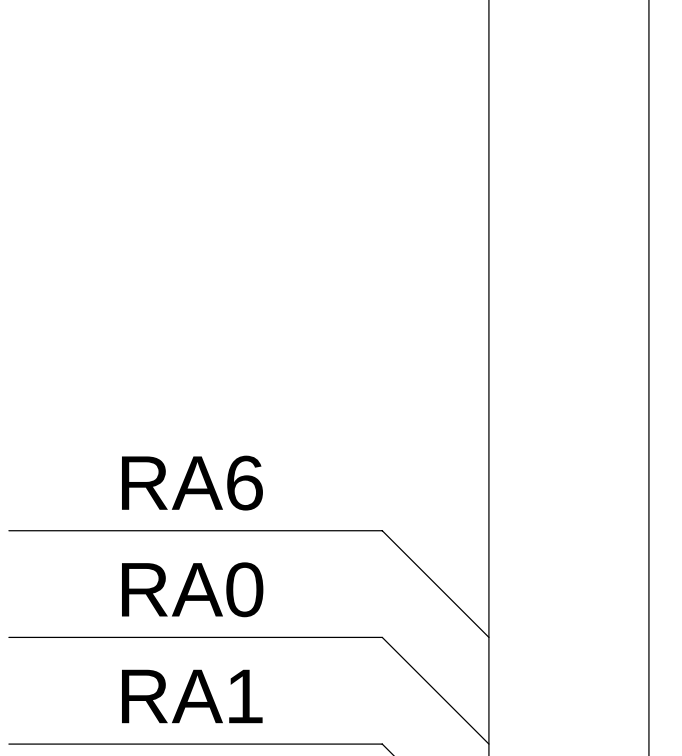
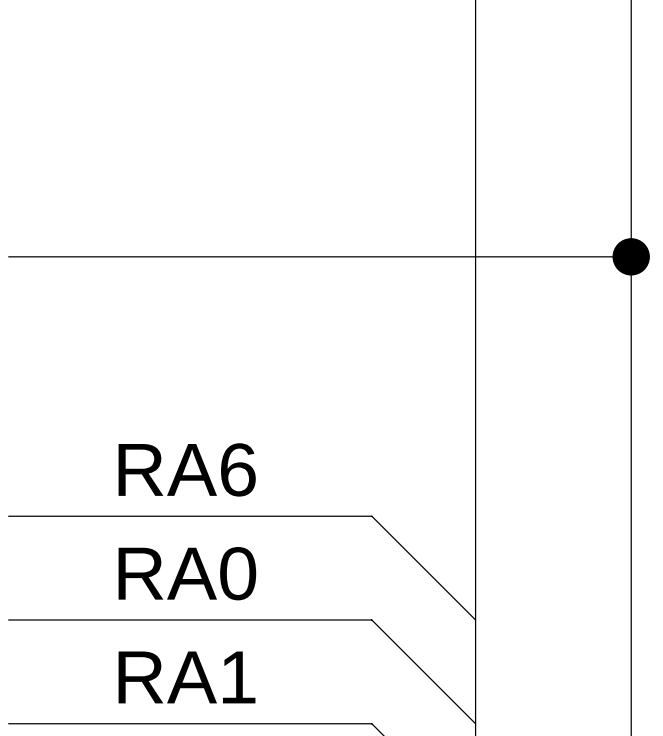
wire: none -> (8, 256) (631, 256)
junction: none -> (631, 256)

